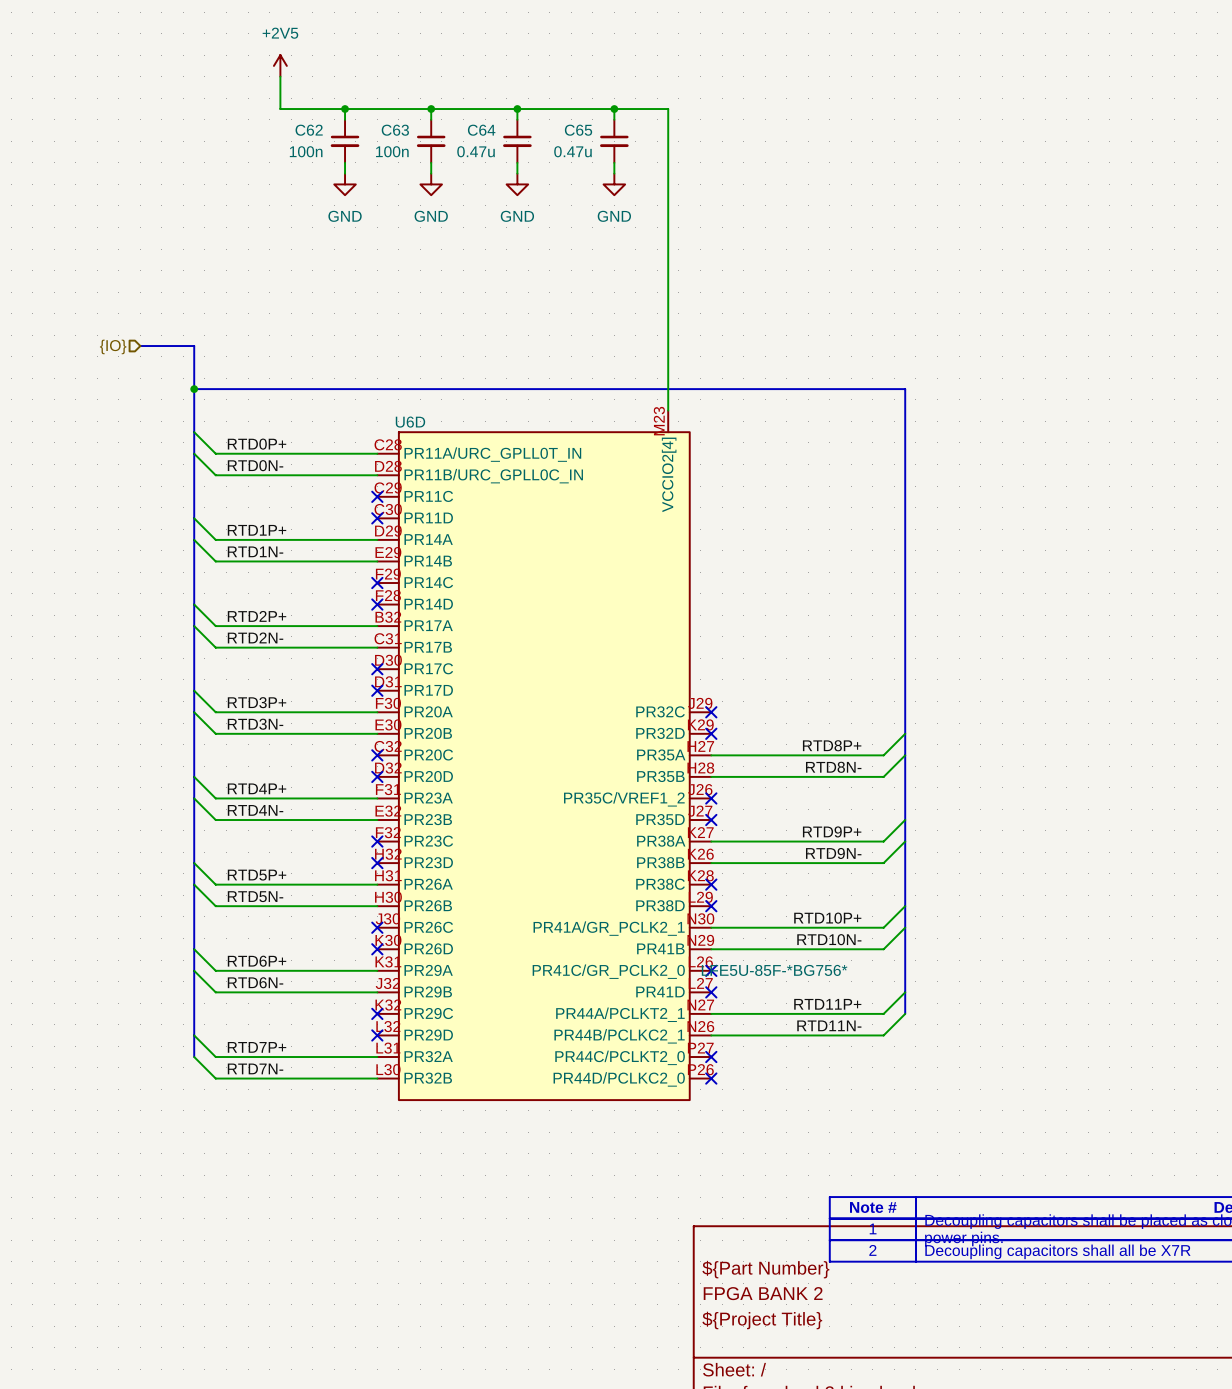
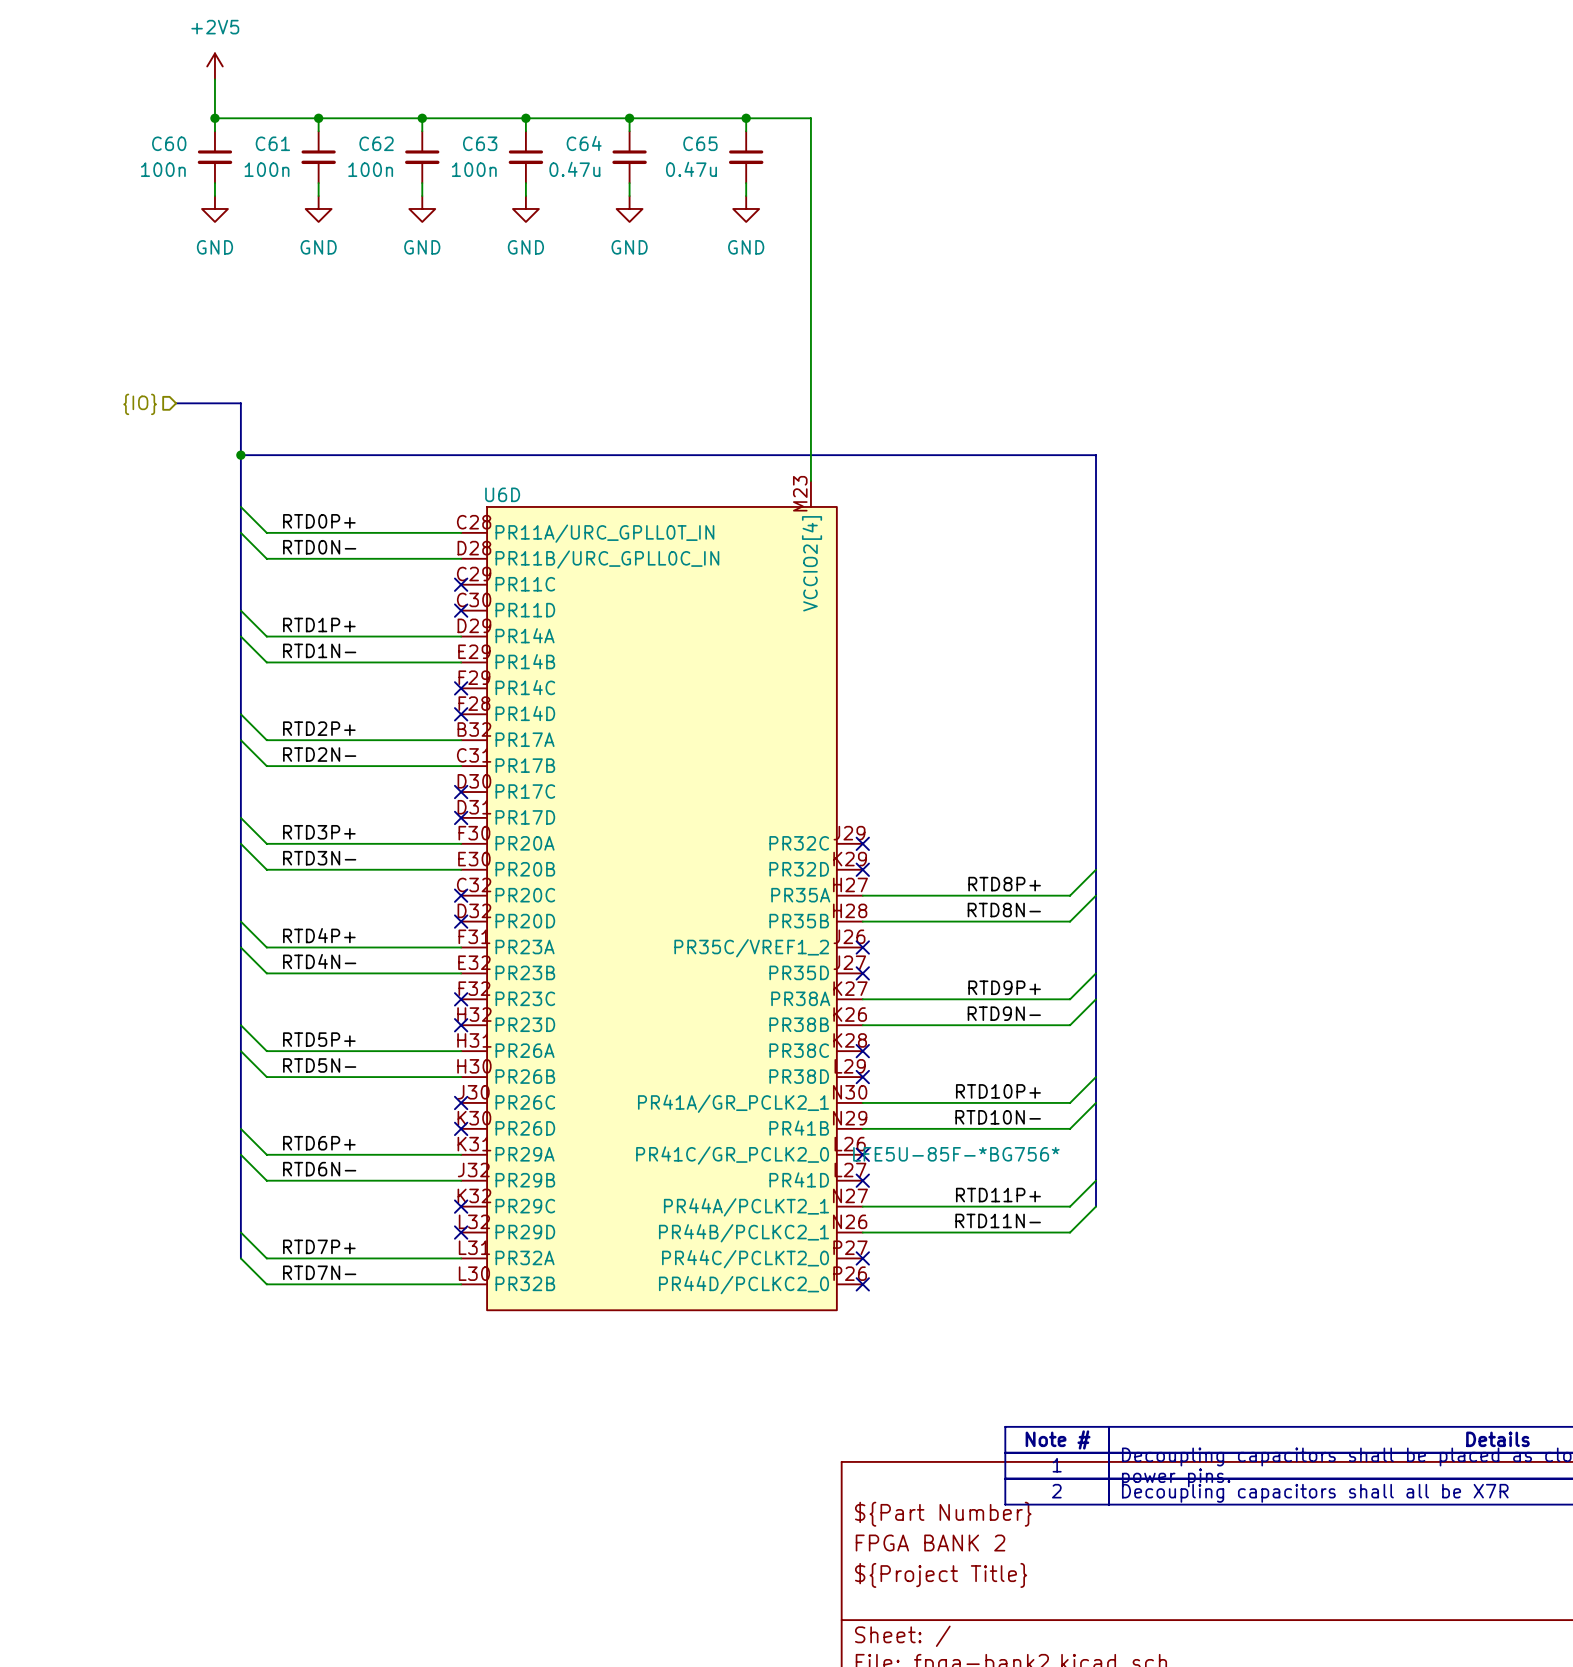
power symbol position: +2V5 (280, 65) -> +2V5 (214, 66)
wire: none -> (214, 79) (214, 131)
wire: (280, 76) (280, 109) -> (214, 118) (344, 118)
junction: none -> (214, 118)
wire: none -> (318, 118) (318, 131)
junction: none -> (318, 118)
C60: none -> 100n (214, 157)
C61: none -> 100n (318, 157)
wire: none -> (214, 183) (214, 196)
wire: none -> (318, 183) (318, 196)
power symbol: none -> GND (214, 208)
power symbol: none -> GND (318, 208)

